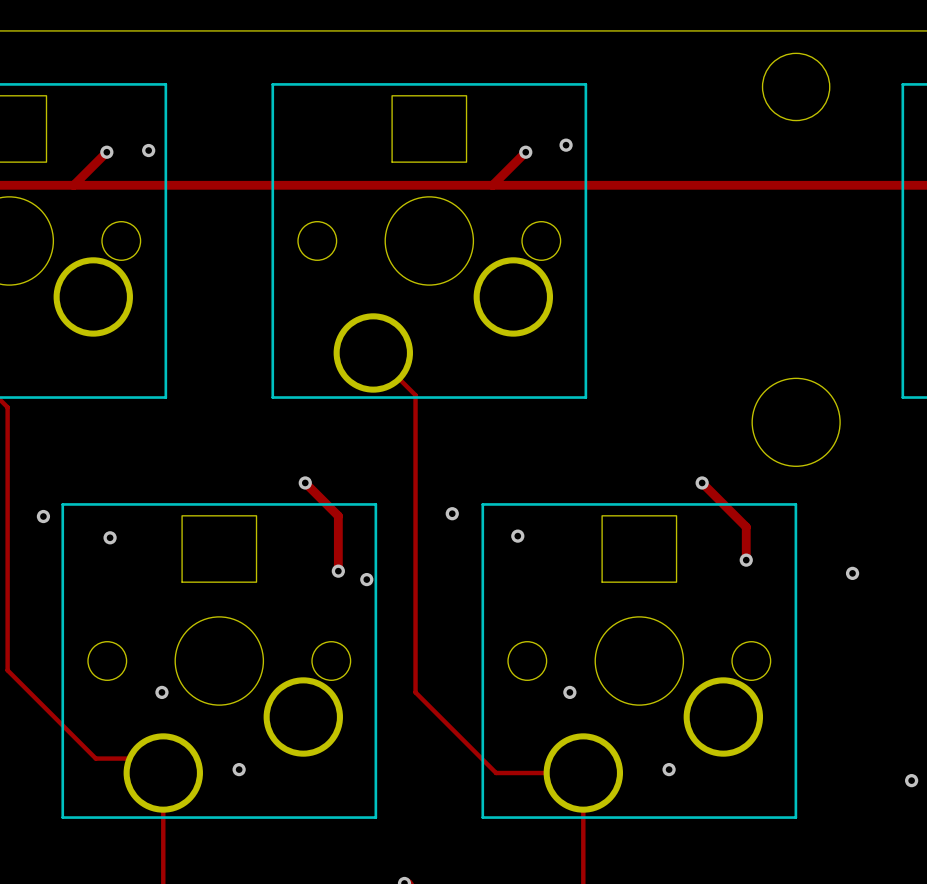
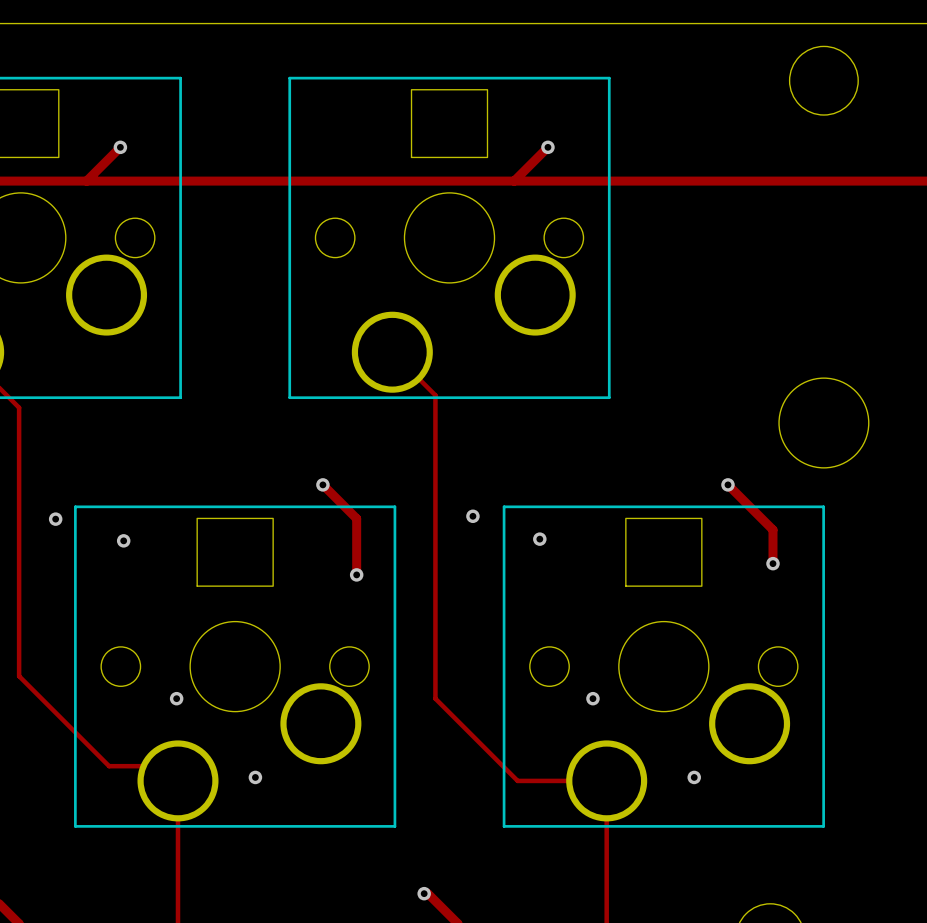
via: (566, 145) -> none
via: (148, 150) -> none
via: (852, 573) -> none
via: (366, 579) -> none

